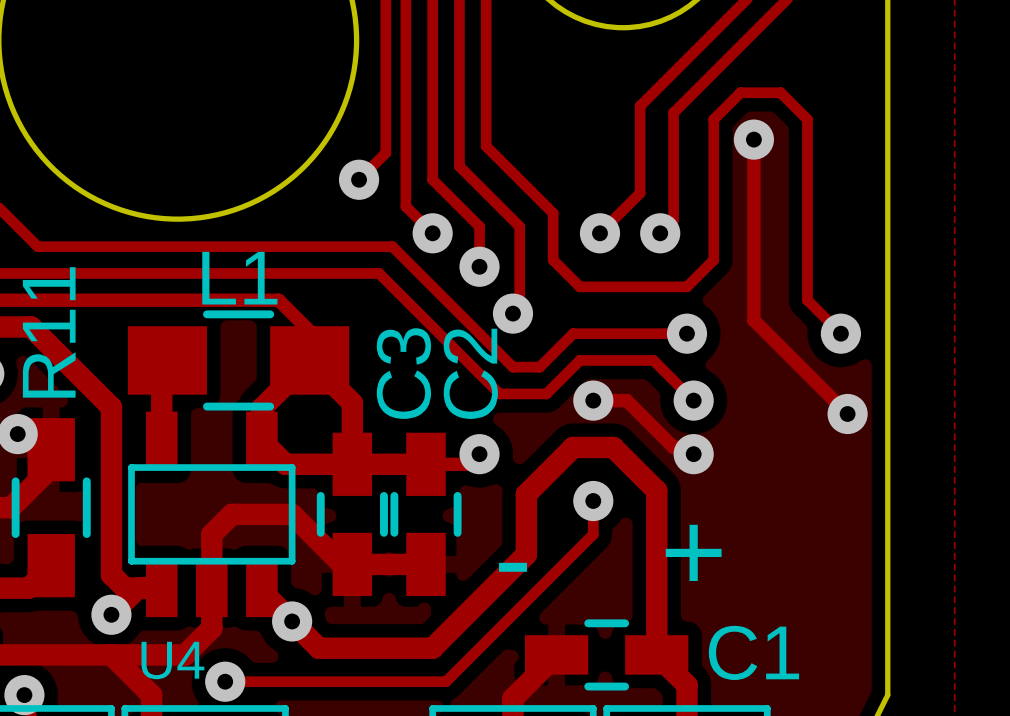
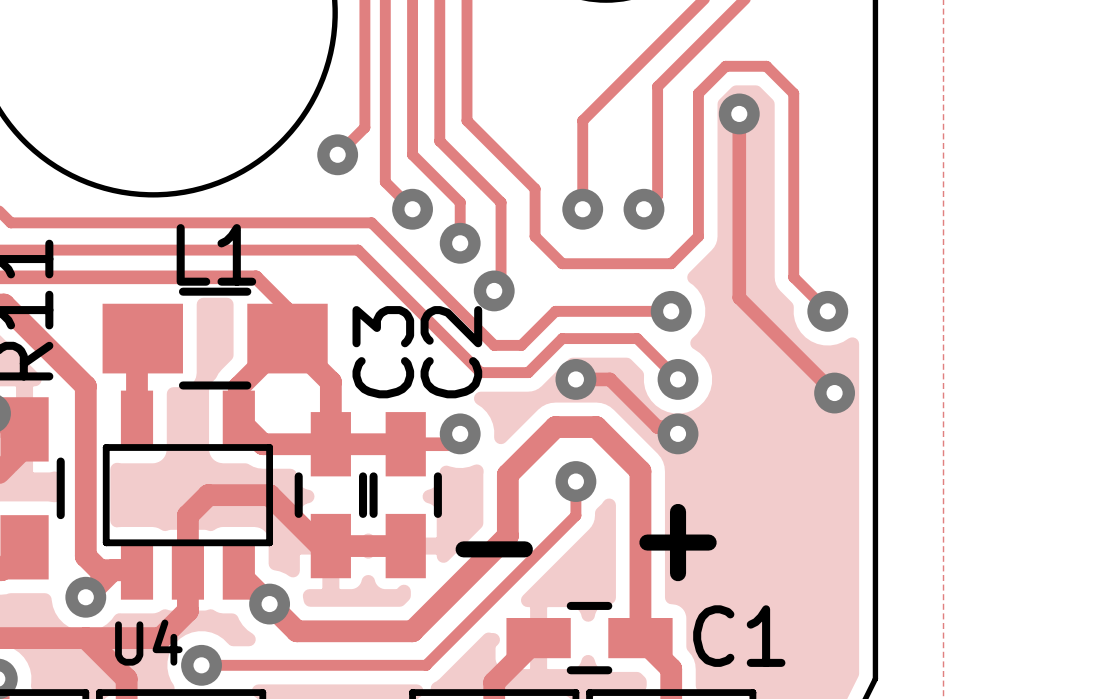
track: (640, 106) (640, 193) (599, 233) -> (623, 79) (582, 120) (582, 209)

